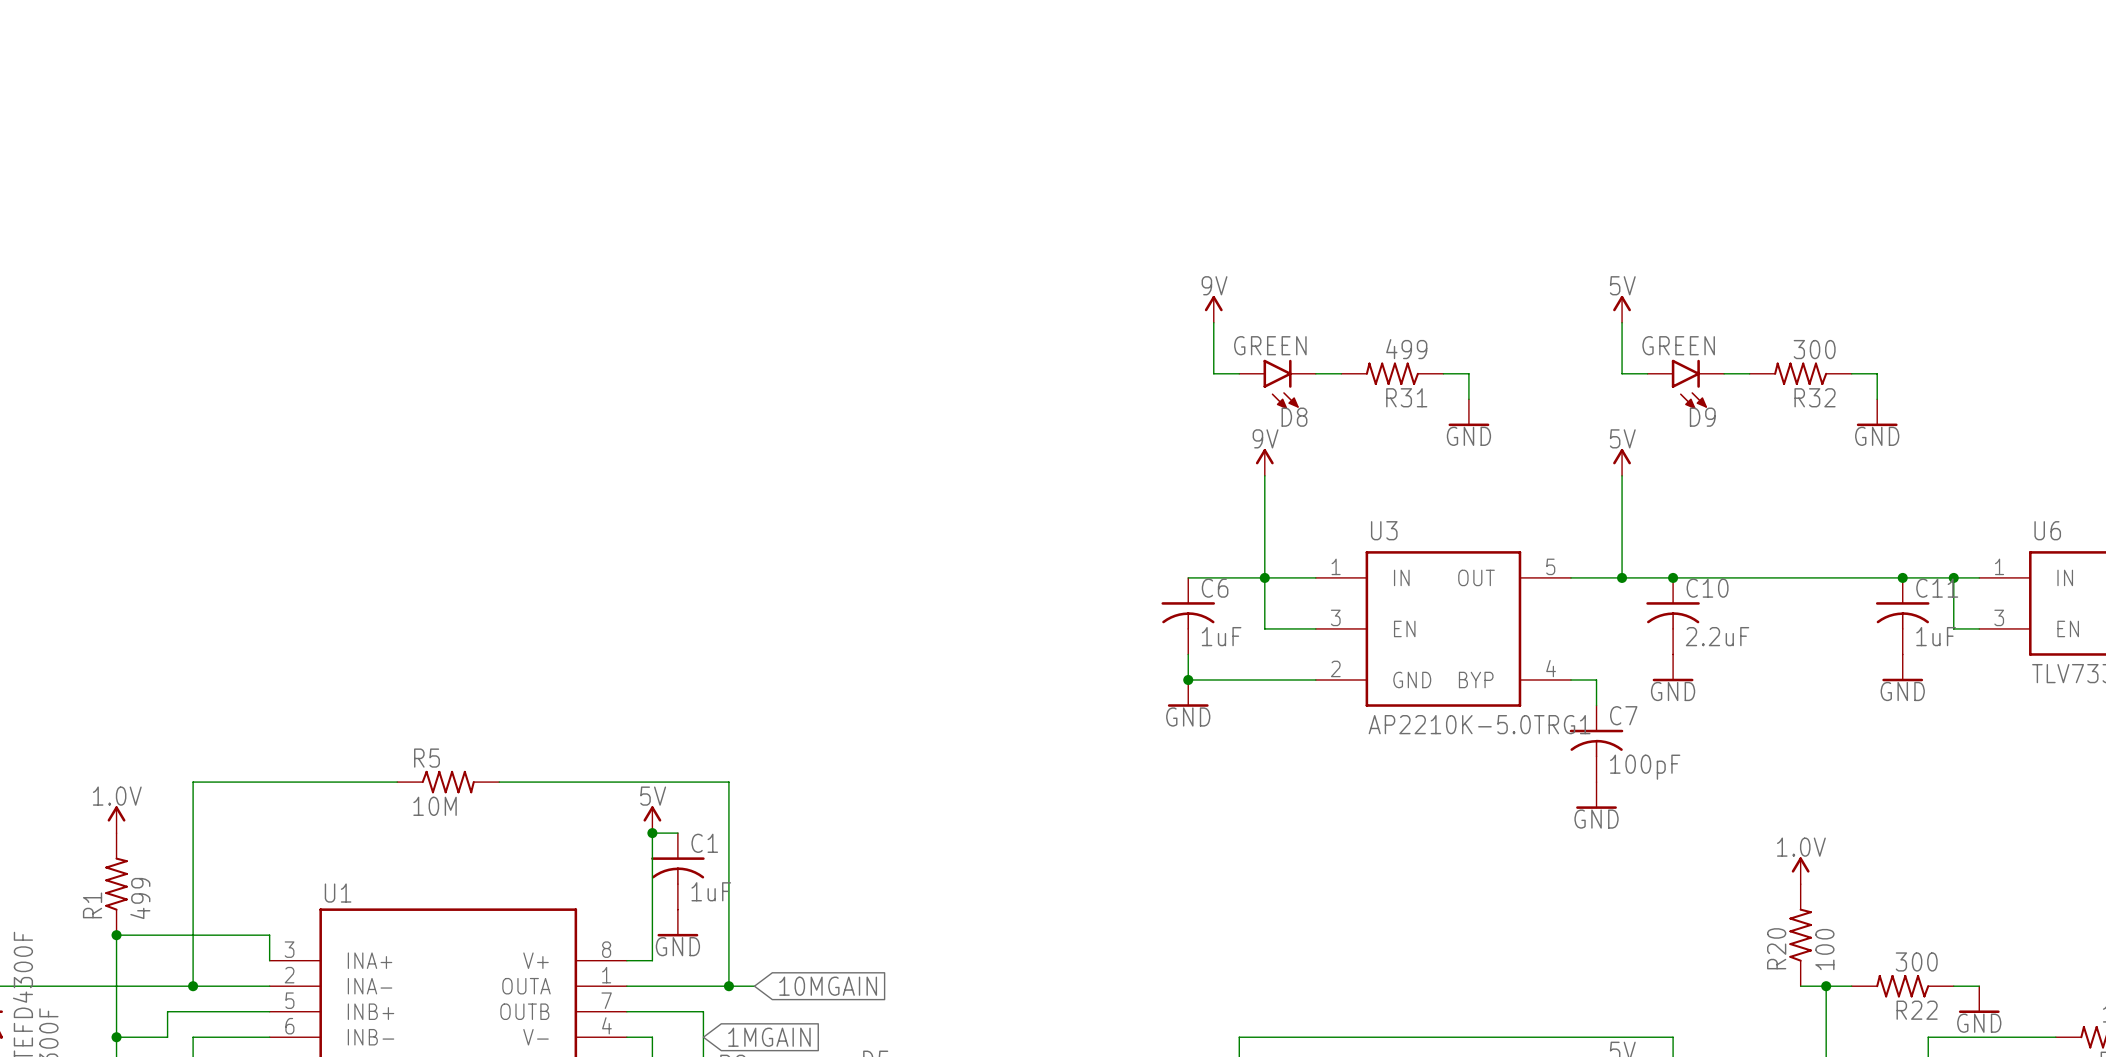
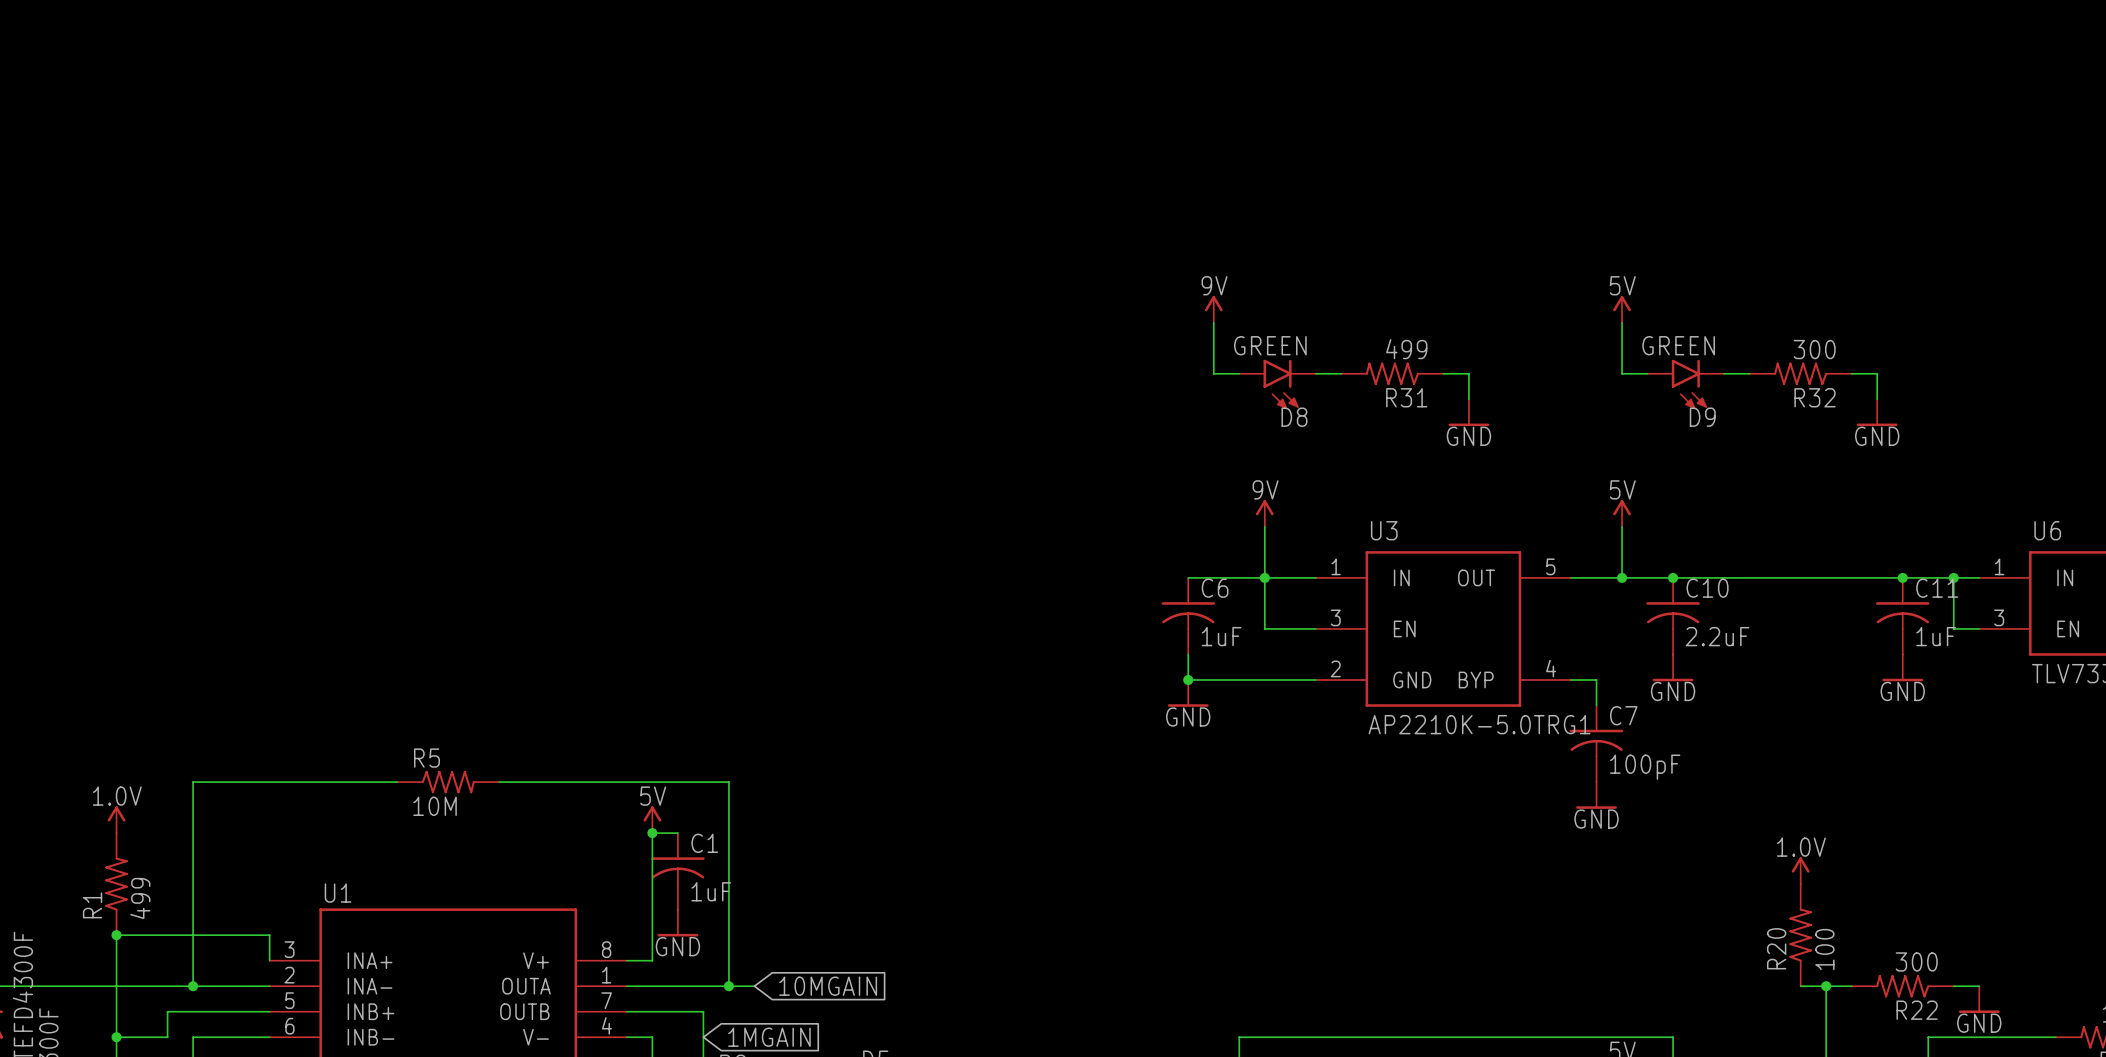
power symbol position: 9V (1264, 462) -> 9V (1264, 513)
power symbol position: 5V (1622, 462) -> 5V (1622, 513)

